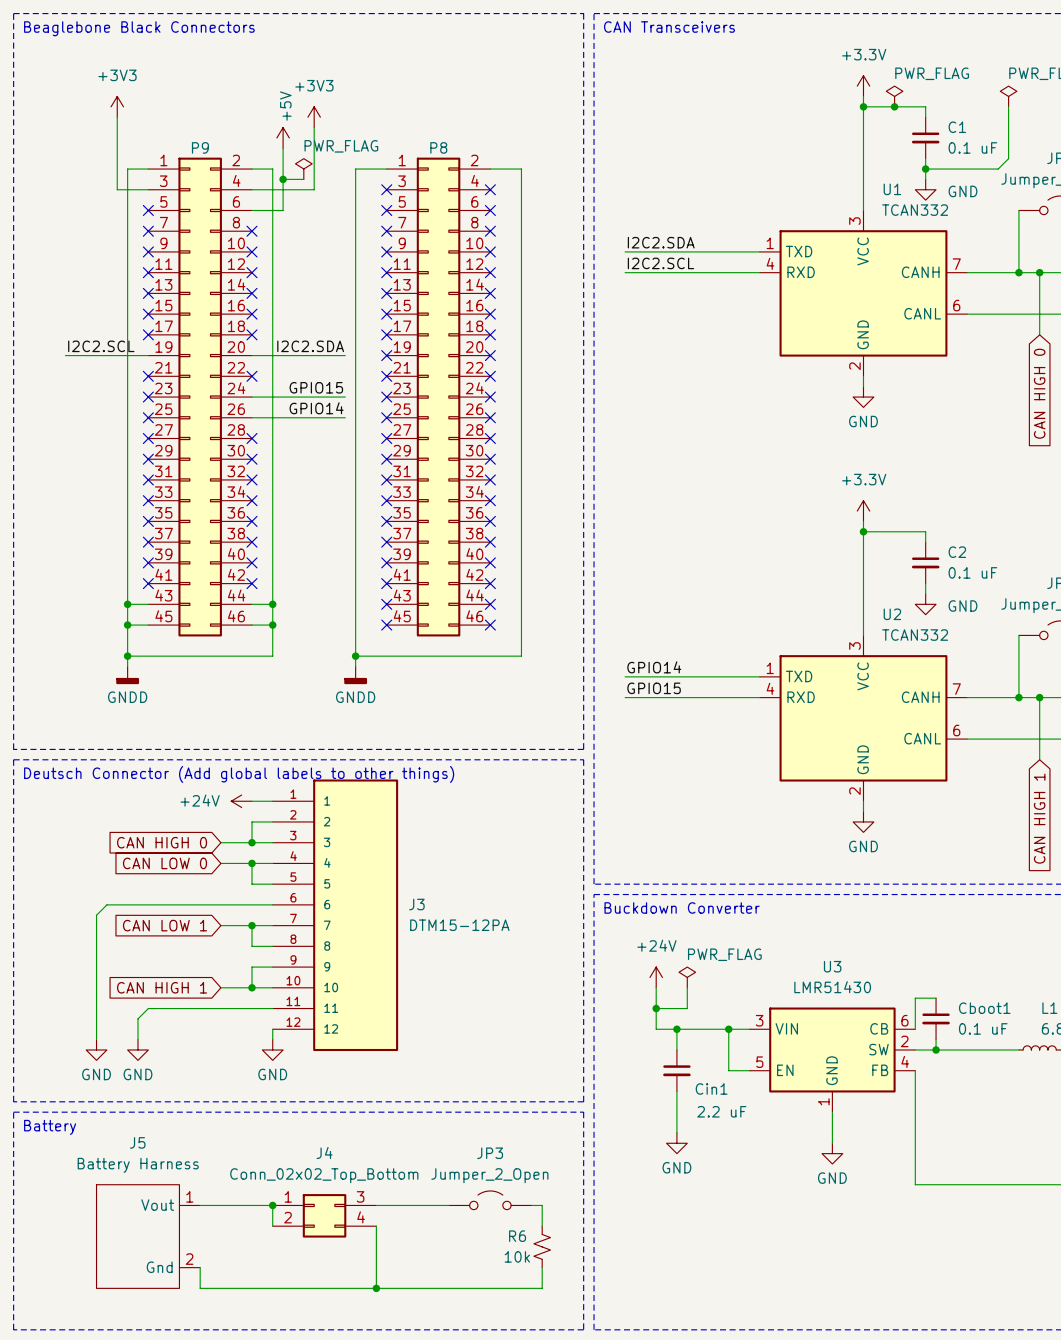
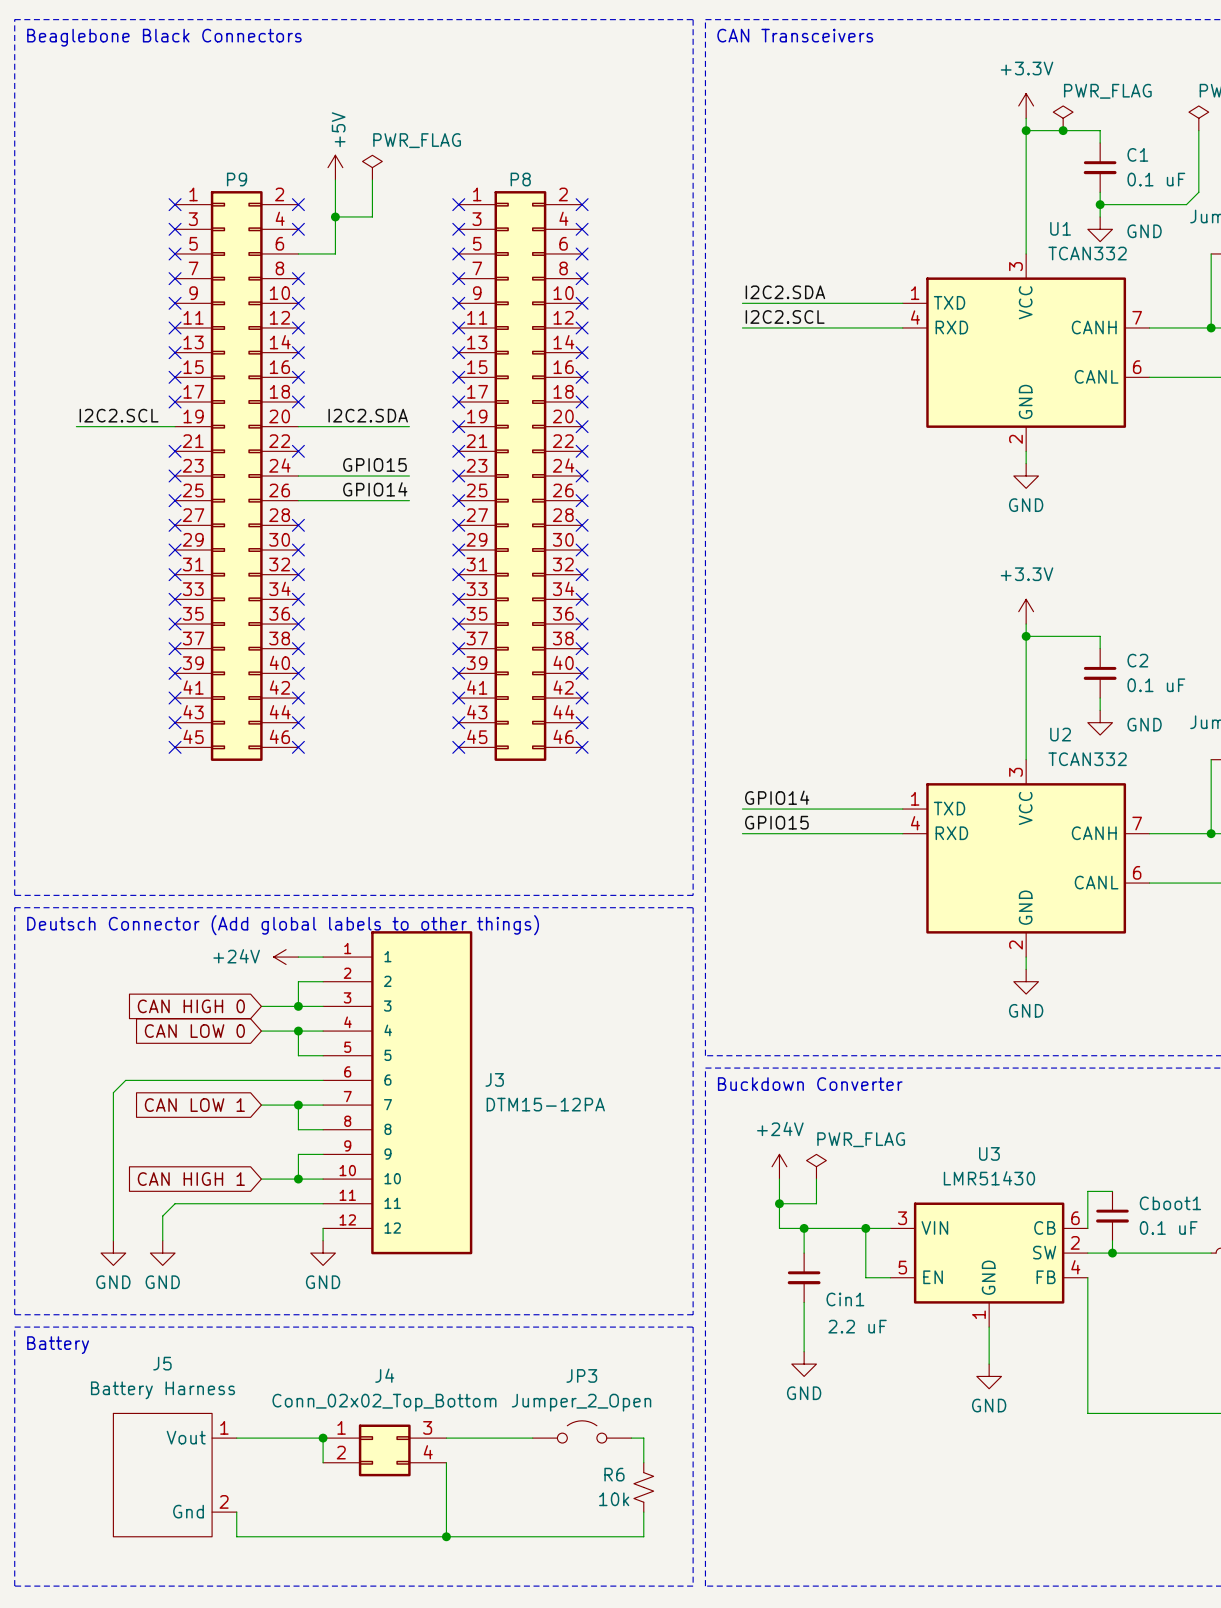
power symbol: +3V3 (117, 106) -> none
wire: (117, 117) (117, 189) (148, 189) -> none
power symbol: +3V3 (314, 117) -> none
wire: (148, 169) (127, 169) (127, 666) -> none
no-connect mark: none -> (175, 204)
wire: (252, 169) (272, 169) (272, 656) (127, 656) -> none
no-connect mark: none -> (298, 204)
power symbol position: PWR_FLAG (303, 169) -> PWR_FLAG (372, 167)
wire: (386, 169) (355, 169) (355, 666) -> none
no-connect mark: none -> (458, 204)
wire: (490, 169) (521, 169) (521, 656) (355, 656) -> none
no-connect mark: none -> (582, 204)
wire: (314, 179) (314, 189) (252, 189) -> (372, 216) (360, 216)
no-connect mark: none -> (175, 229)
no-connect mark: none -> (298, 229)
wire: (127, 604) (148, 604) -> none
junction: (127, 604) -> none
no-connect mark: none -> (175, 722)
wire: (252, 604) (272, 604) -> none
no-connect mark: none -> (298, 722)
junction: (272, 604) -> none
wire: (127, 625) (148, 625) -> none
junction: (127, 625) -> none
no-connect mark: none -> (175, 747)
wire: (252, 625) (272, 625) -> none
no-connect mark: none -> (298, 747)
junction: (272, 625) -> none
junction: (127, 656) -> none
junction: (355, 656) -> none
power symbol: GNDD (127, 675) -> none
power symbol: GNDD (355, 675) -> none

